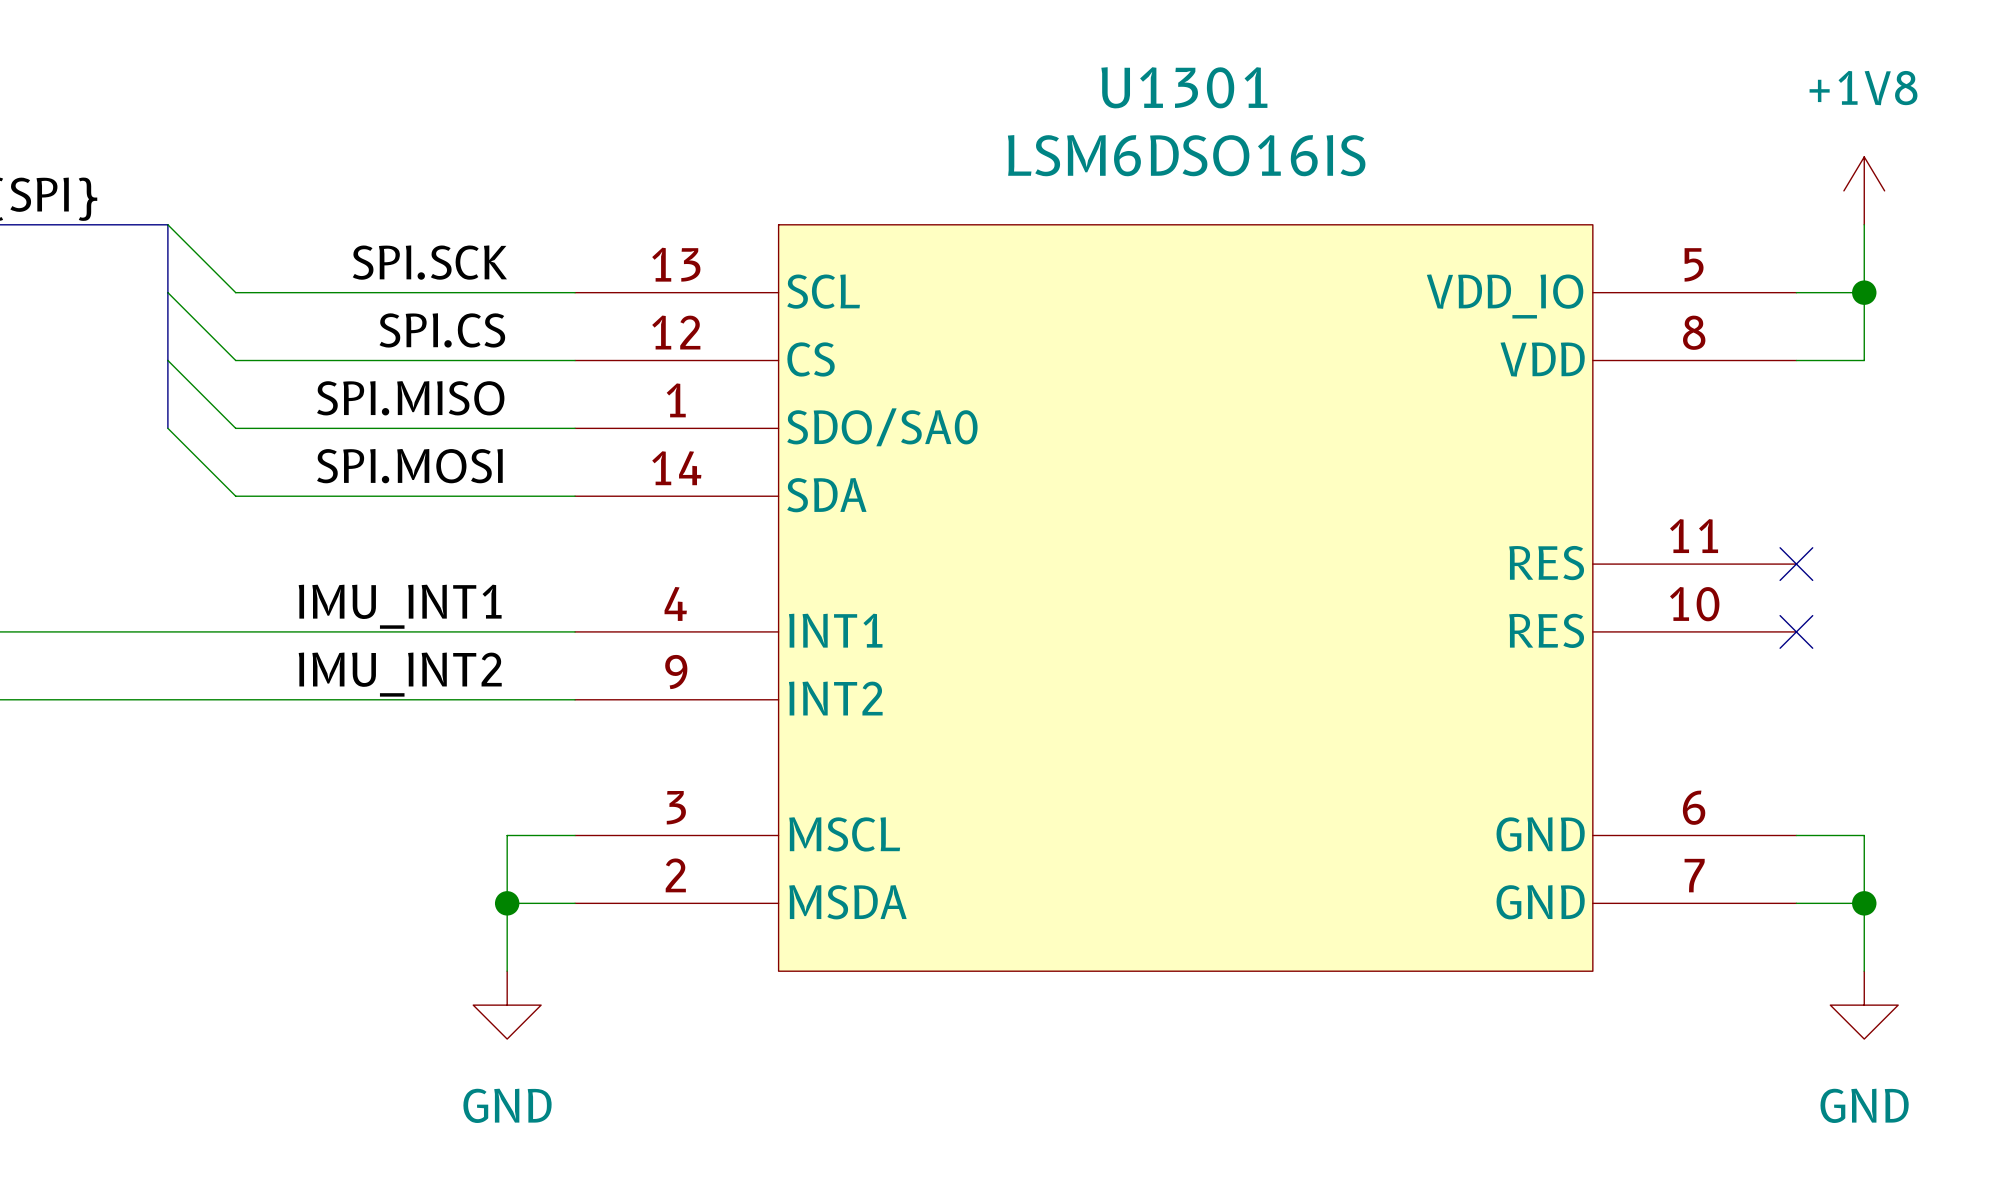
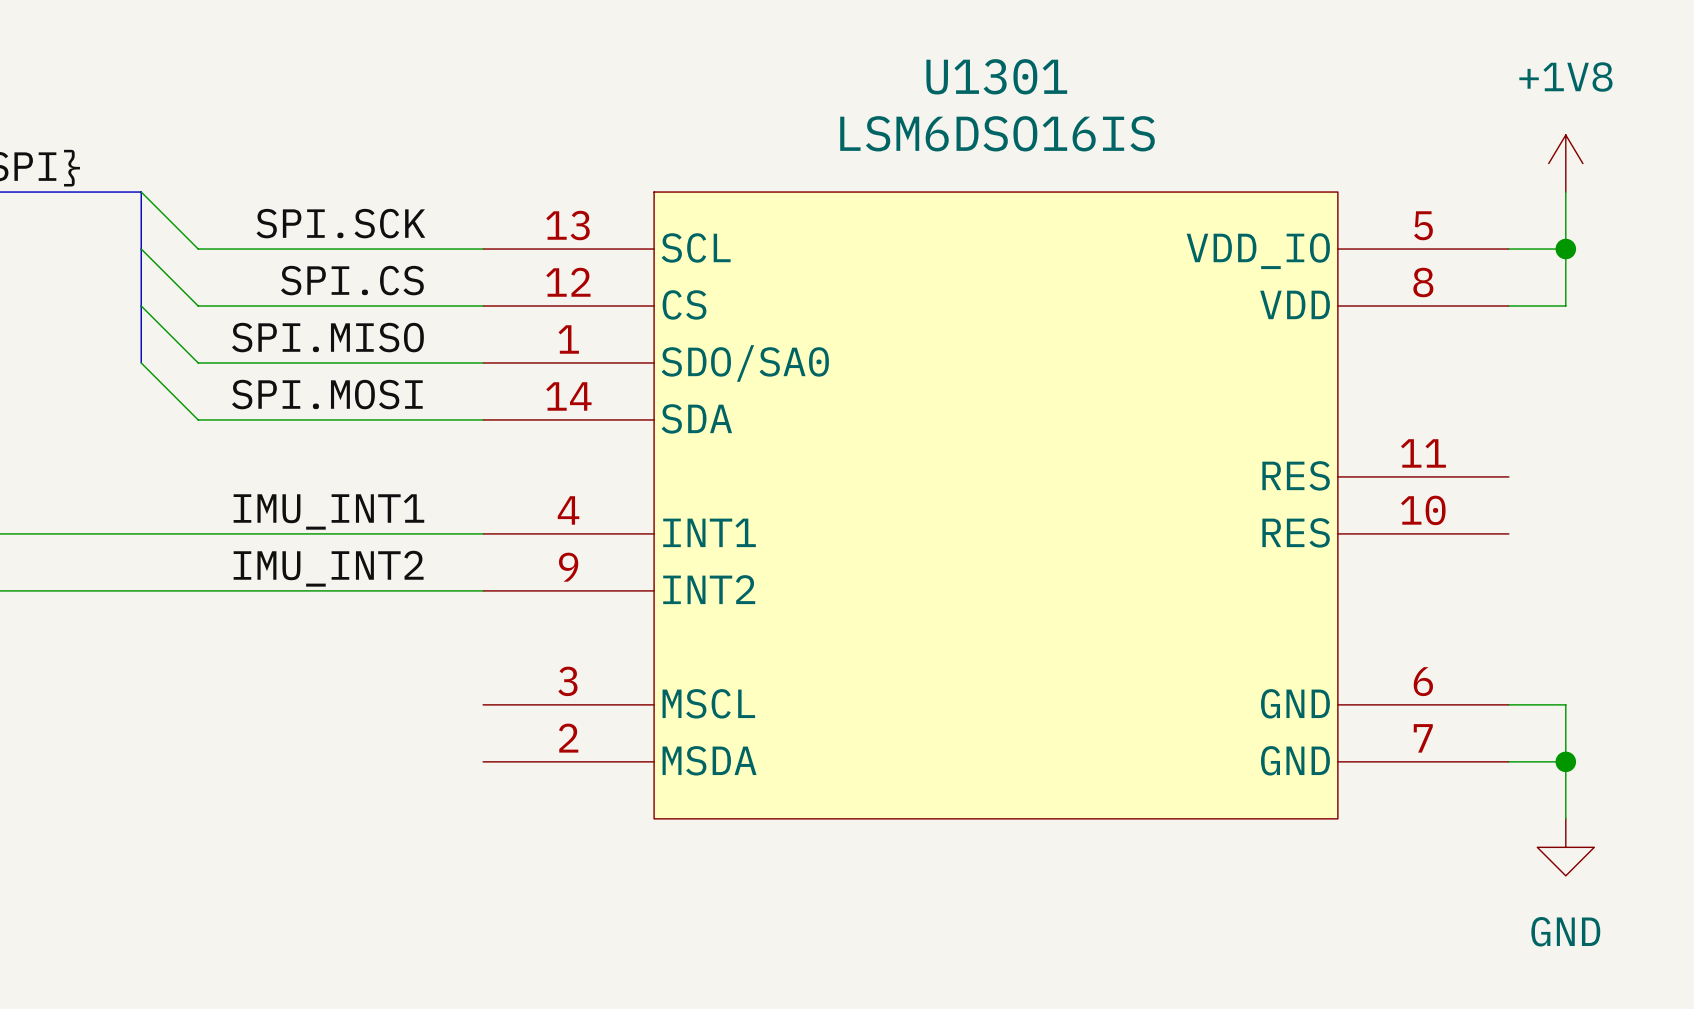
no-connect mark: (1796, 564) -> none
no-connect mark: (1796, 631) -> none
wire: (575, 835) (507, 835) (507, 971) -> none
wire: (507, 903) (575, 903) -> none
junction: (507, 903) -> none
power symbol: GND (507, 1005) -> none

